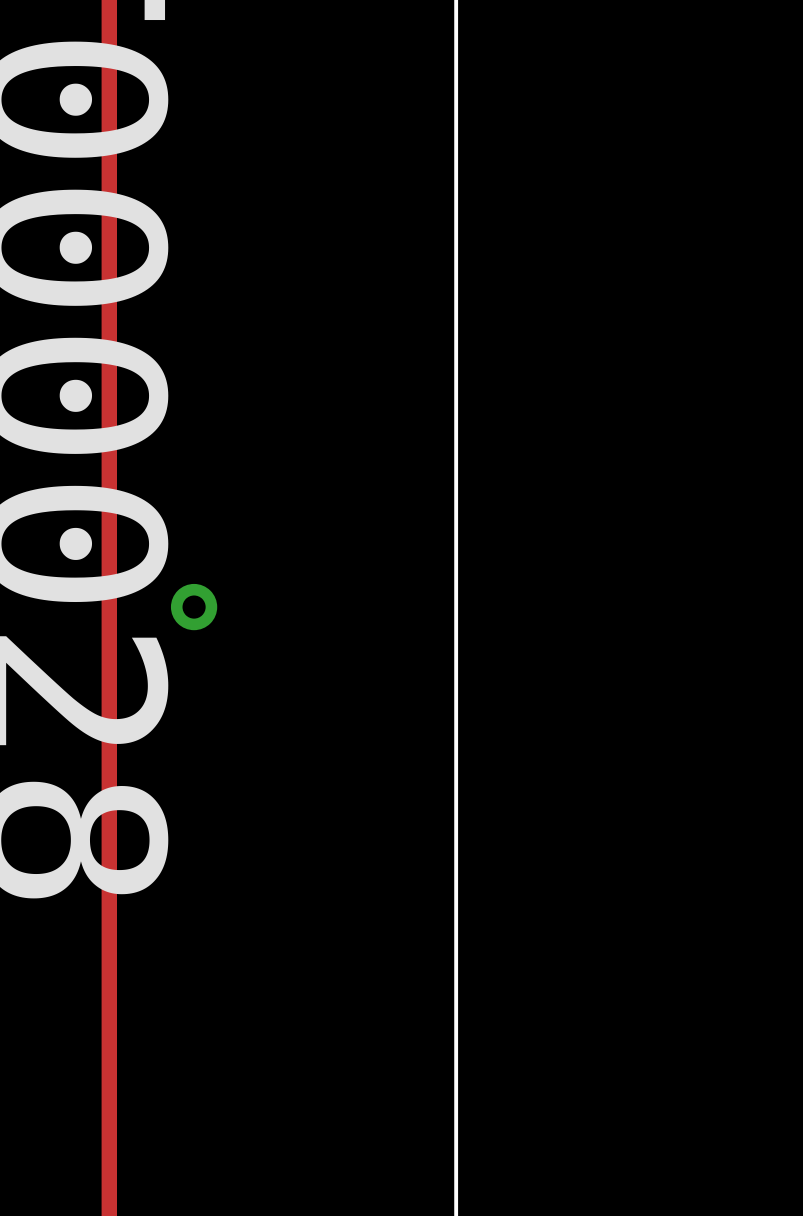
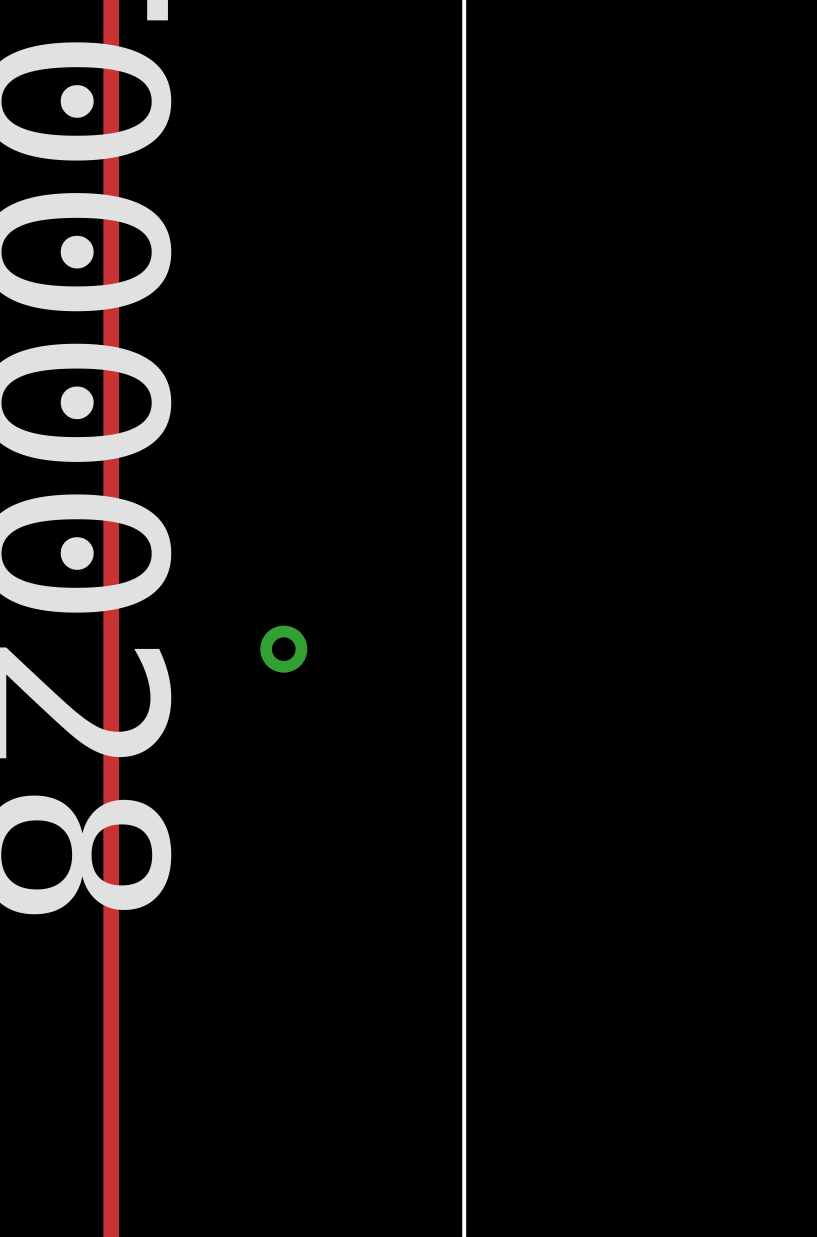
via position: (194, 607) -> (283, 649)

